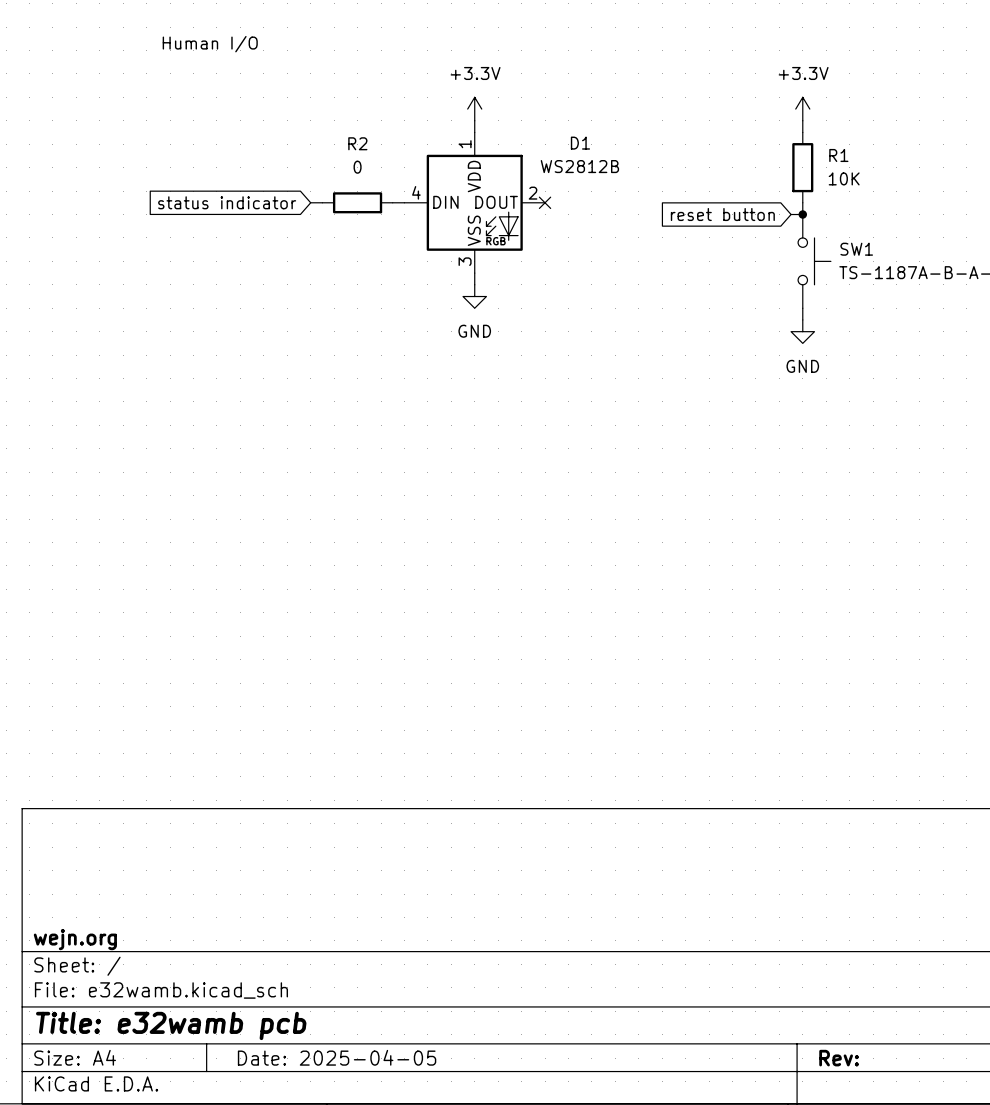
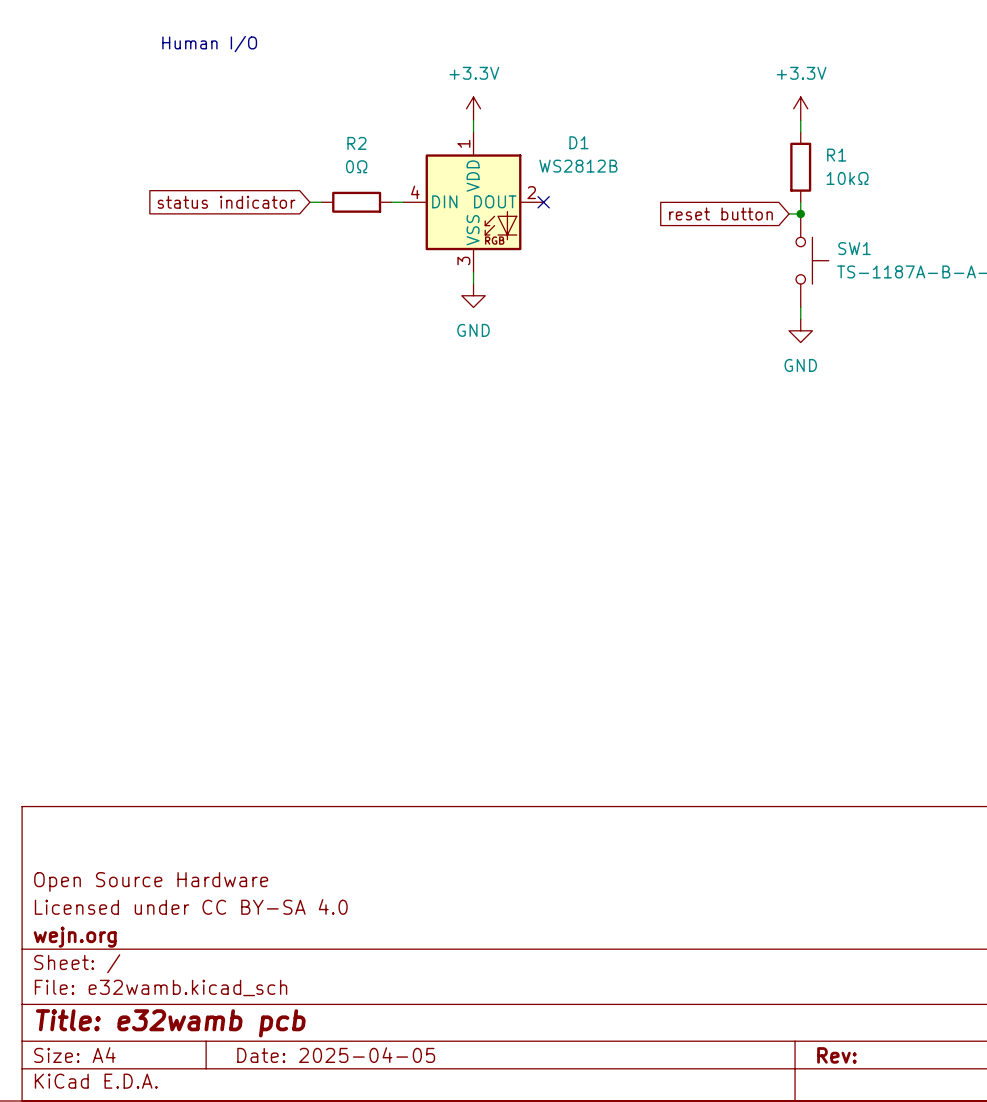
R2 value: 0 (357, 167) -> 0Ω (356, 166)
R1 value: 10K (844, 178) -> 10kΩ (847, 178)
title block: none -> Open Source Hardware (151, 881)
title block: none -> Licensed under CC BY-SA 4.0 (191, 906)

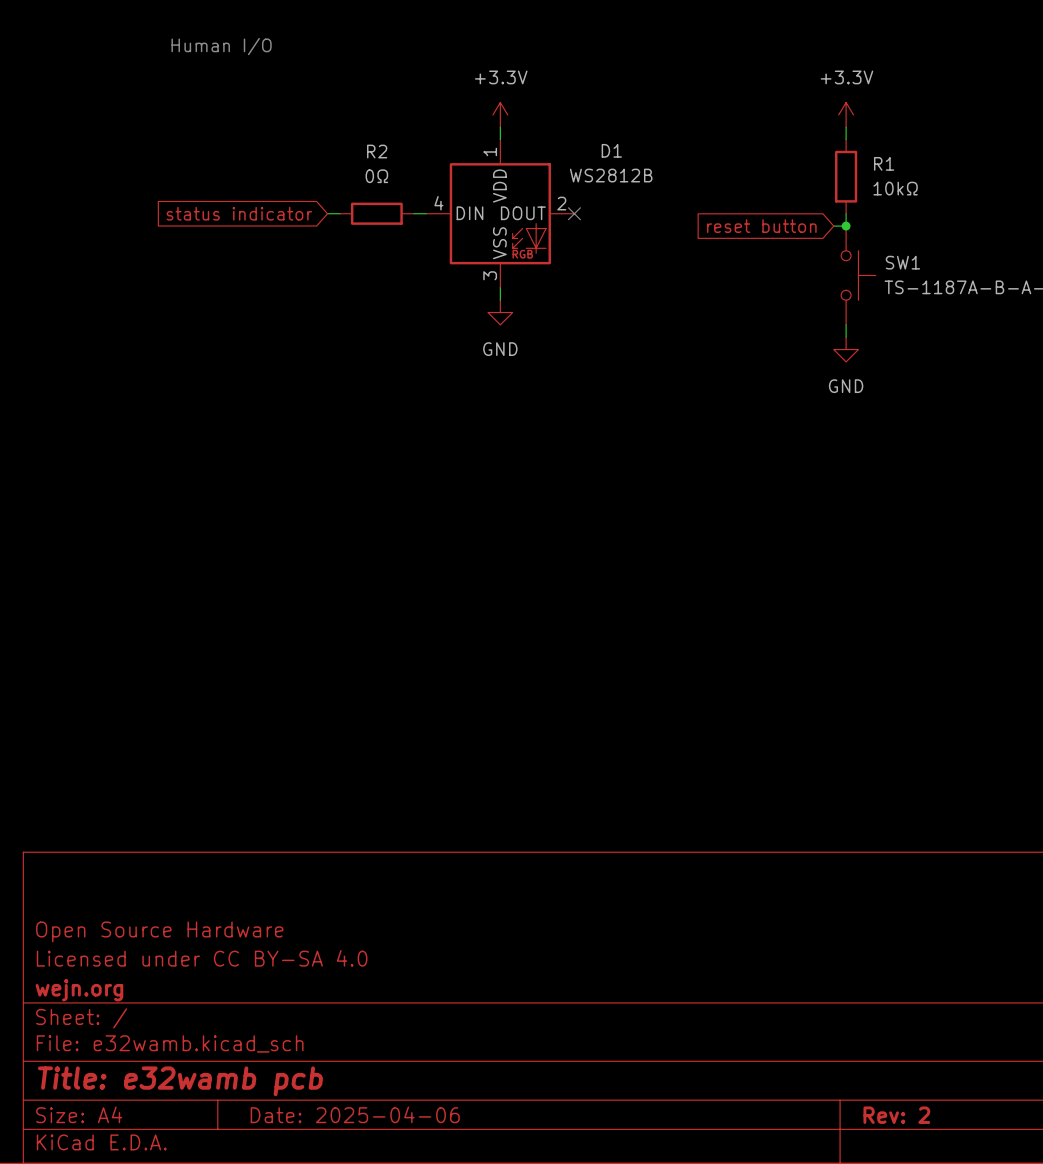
title block: Date: 2025-04-05 (336, 1055) -> Date: 2025-04-06 (355, 1114)
title block: Rev: (836, 1055) -> Rev: 2 (896, 1115)

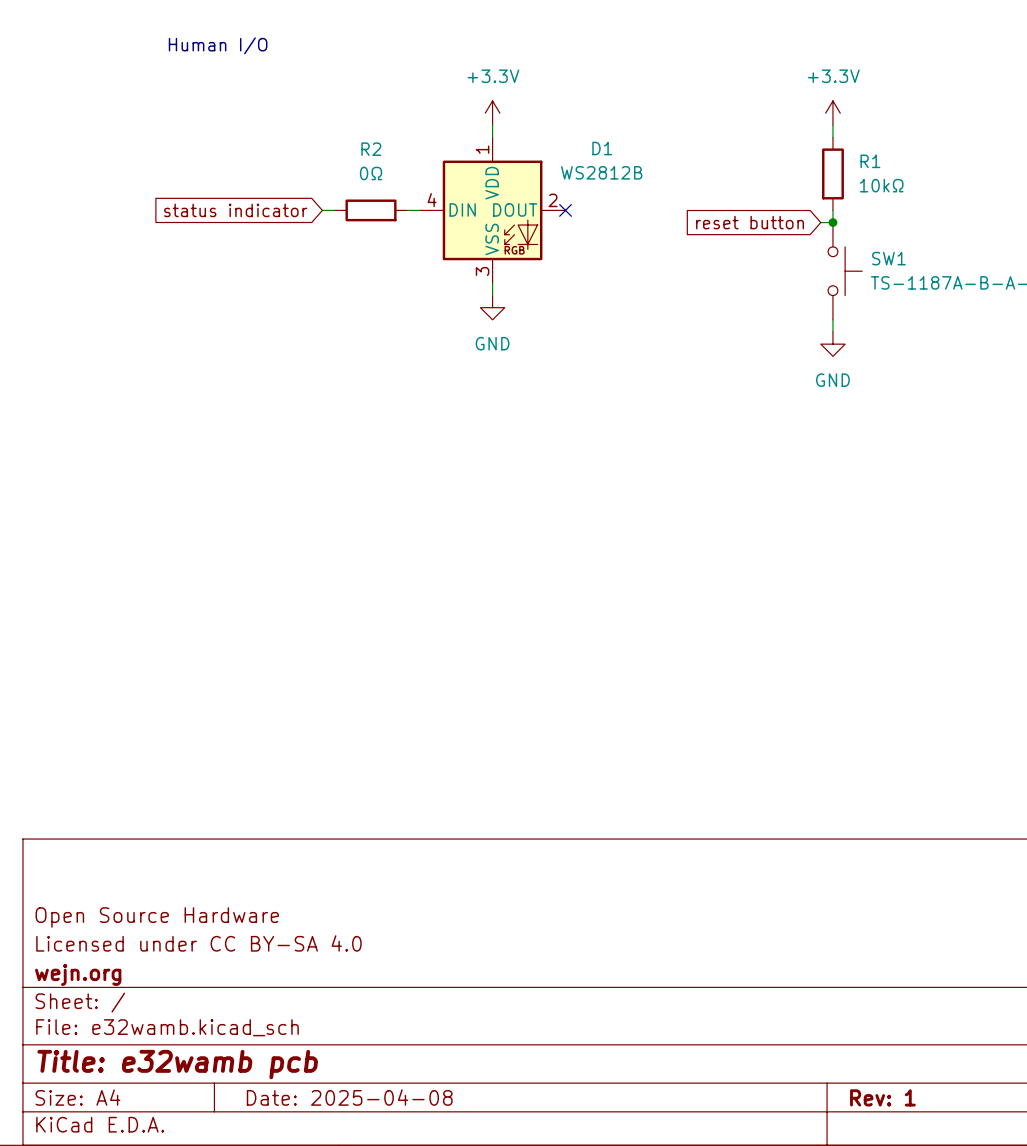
title block: Date: 2025-04-06 (355, 1114) -> Date: 2025-04-08 (349, 1097)
title block: Rev: 2 (896, 1115) -> Rev: 1 (882, 1097)

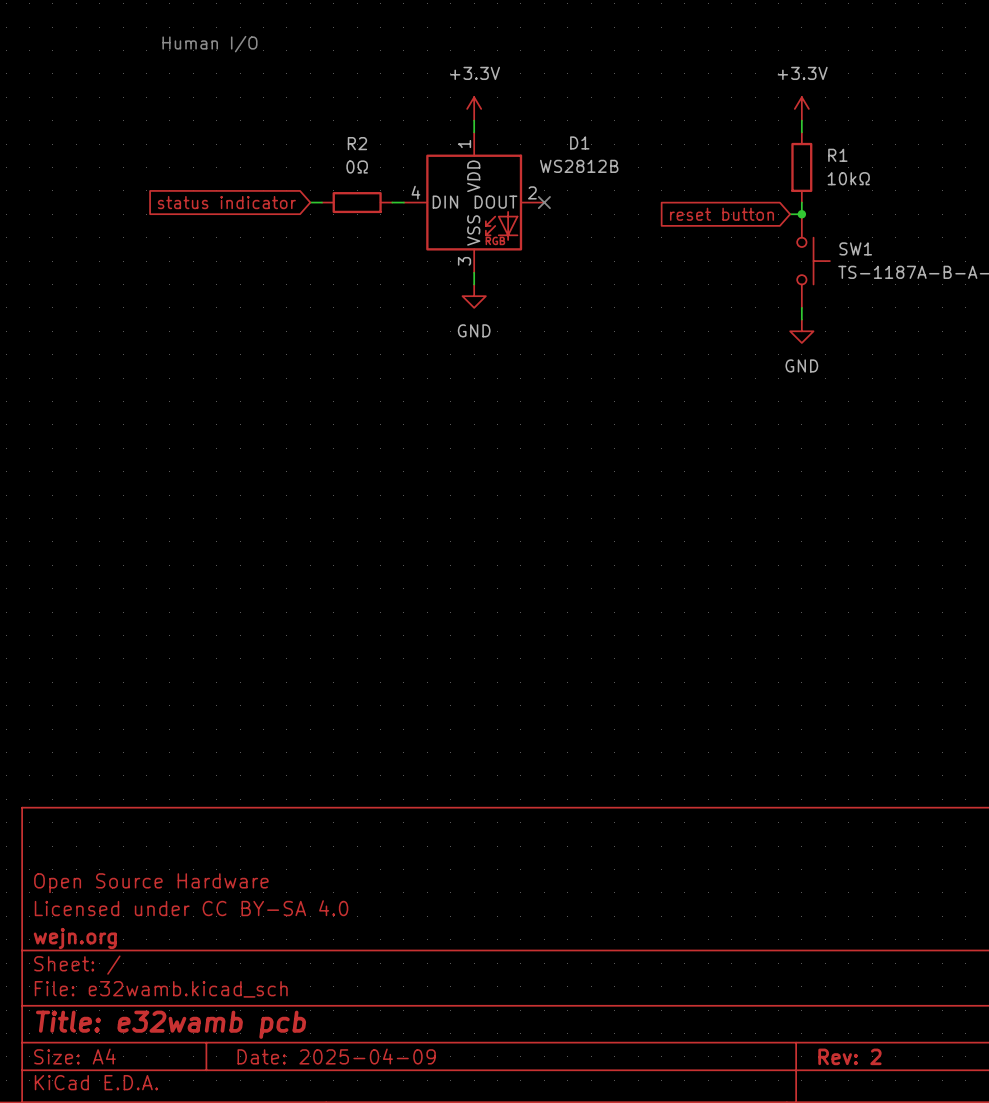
title block: Date: 2025-04-08 (349, 1097) -> Date: 2025-04-09 (336, 1056)
title block: Rev: 1 (882, 1097) -> Rev: 2 (849, 1056)

